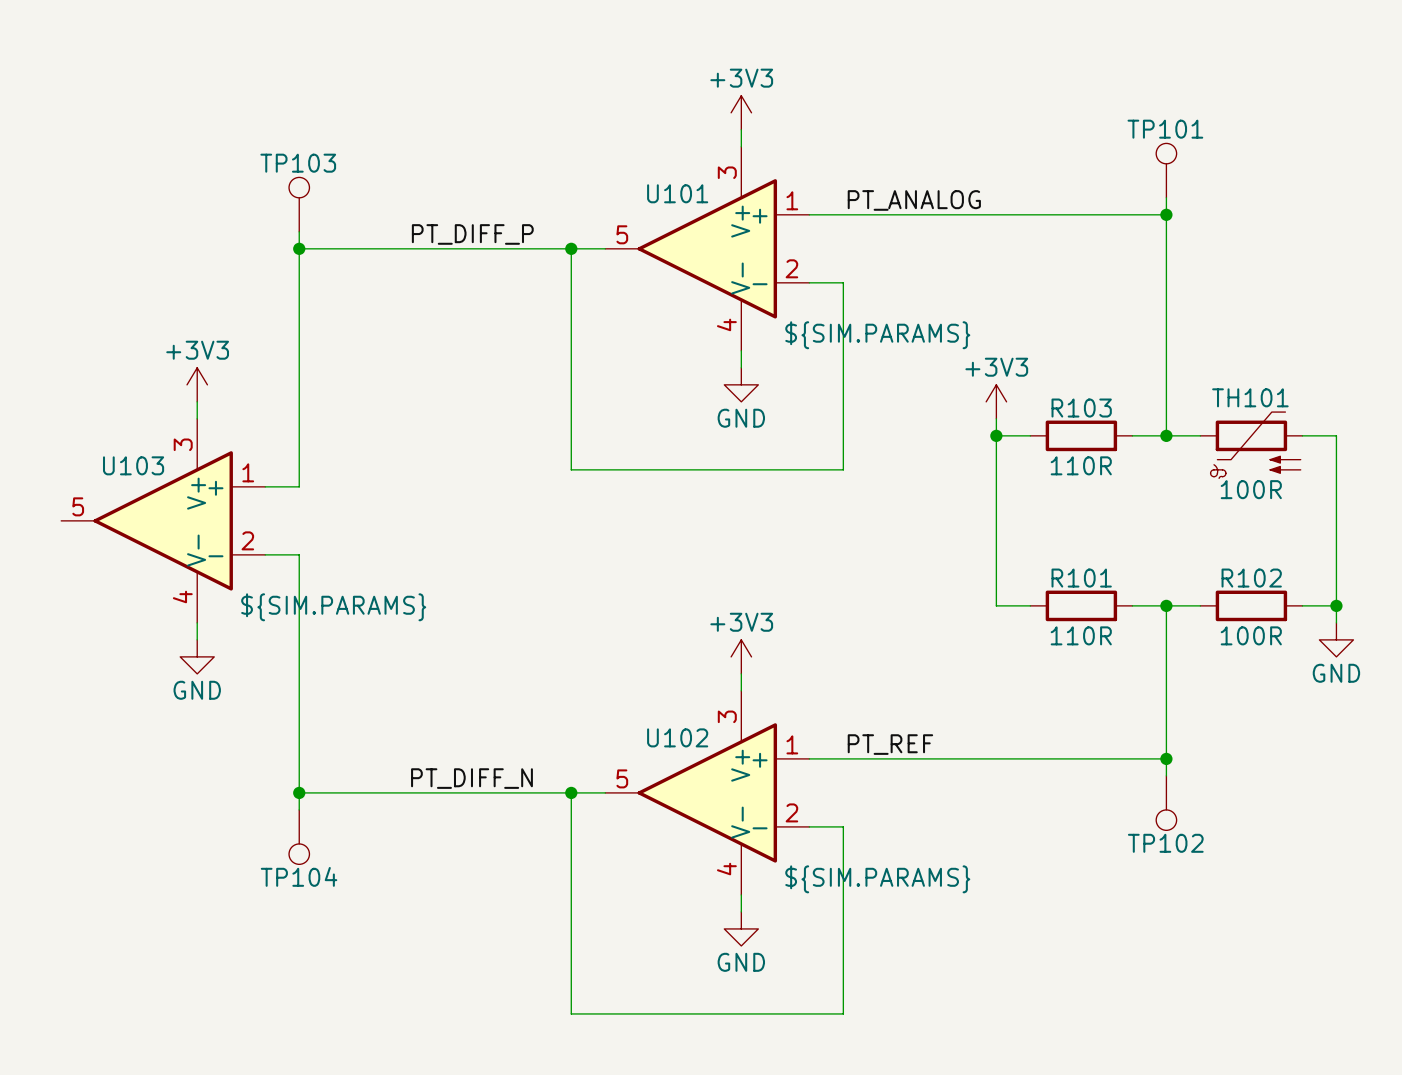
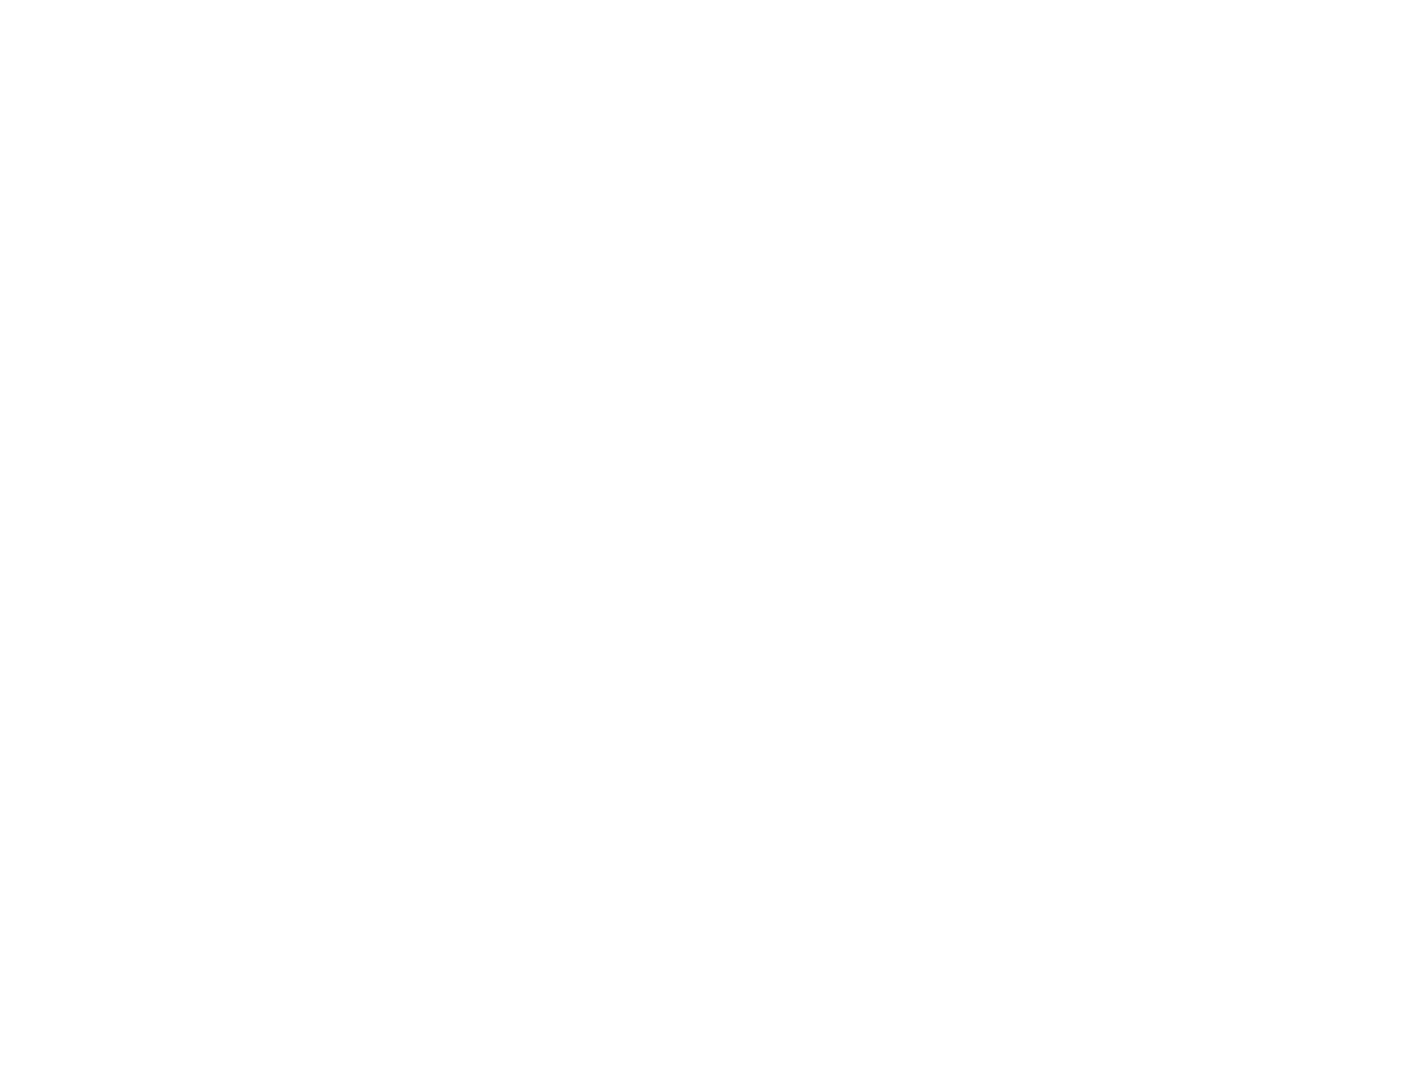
power symbol: +3V3 (741, 112) -> none
wire: (741, 129) (741, 146) -> none
TP101: (1166, 170) -> none
wire: (1166, 197) (1166, 435) -> none
label: PT_ANALOG (914, 200) -> none
TP103: (299, 204) -> none
wire: (809, 214) (1166, 214) -> none
junction: (1166, 214) -> none
wire: (299, 231) (299, 486) (265, 486) -> none
label: PT_DIFF_P (472, 234) -> none
wire: (299, 248) (605, 248) -> none
junction: (299, 248) -> none
wire: (571, 248) (571, 469) (843, 469) (843, 282) (809, 282) -> none
junction: (571, 248) -> none
U101: ${SIM.PARAMS} (707, 248) -> none
wire: (741, 350) (741, 367) -> none
power symbol: +3V3 (197, 384) -> none
power symbol: GND (741, 384) -> none
wire: (197, 401) (197, 418) -> none
power symbol: +3V3 (996, 401) -> none
wire: (996, 418) (996, 605) (1030, 605) -> none
wire: (996, 435) (1030, 435) -> none
junction: (996, 435) -> none
R103: 110R (1081, 435) -> none
wire: (1132, 435) (1200, 435) -> none
junction: (1166, 435) -> none
wire: (1302, 435) (1336, 435) (1336, 622) -> none
TH101: 100R (1251, 445) -> none
U103: ${SIM.PARAMS} (163, 520) -> none
wire: (265, 554) (299, 554) (299, 809) -> none
R101: 110R (1081, 605) -> none
wire: (1132, 605) (1200, 605) -> none
wire: (1166, 605) (1166, 775) -> none
junction: (1166, 605) -> none
R102: 100R (1251, 605) -> none
wire: (1302, 605) (1336, 605) -> none
junction: (1336, 605) -> none
wire: (197, 622) (197, 639) -> none
power symbol: GND (1336, 639) -> none
power symbol: GND (197, 656) -> none
power symbol: +3V3 (741, 656) -> none
wire: (741, 673) (741, 690) -> none
label: PT_REF (890, 744) -> none
wire: (809, 758) (1166, 758) -> none
junction: (1166, 758) -> none
label: PT_DIFF_N (471, 778) -> none
wire: (299, 792) (605, 792) -> none
junction: (299, 792) -> none
wire: (571, 792) (571, 1013) (843, 1013) (843, 826) (809, 826) -> none
junction: (571, 792) -> none
U102: ${SIM.PARAMS} (707, 792) -> none
TP102: (1166, 803) -> none
TP104: (299, 837) -> none
wire: (741, 894) (741, 911) -> none
power symbol: GND (741, 928) -> none

